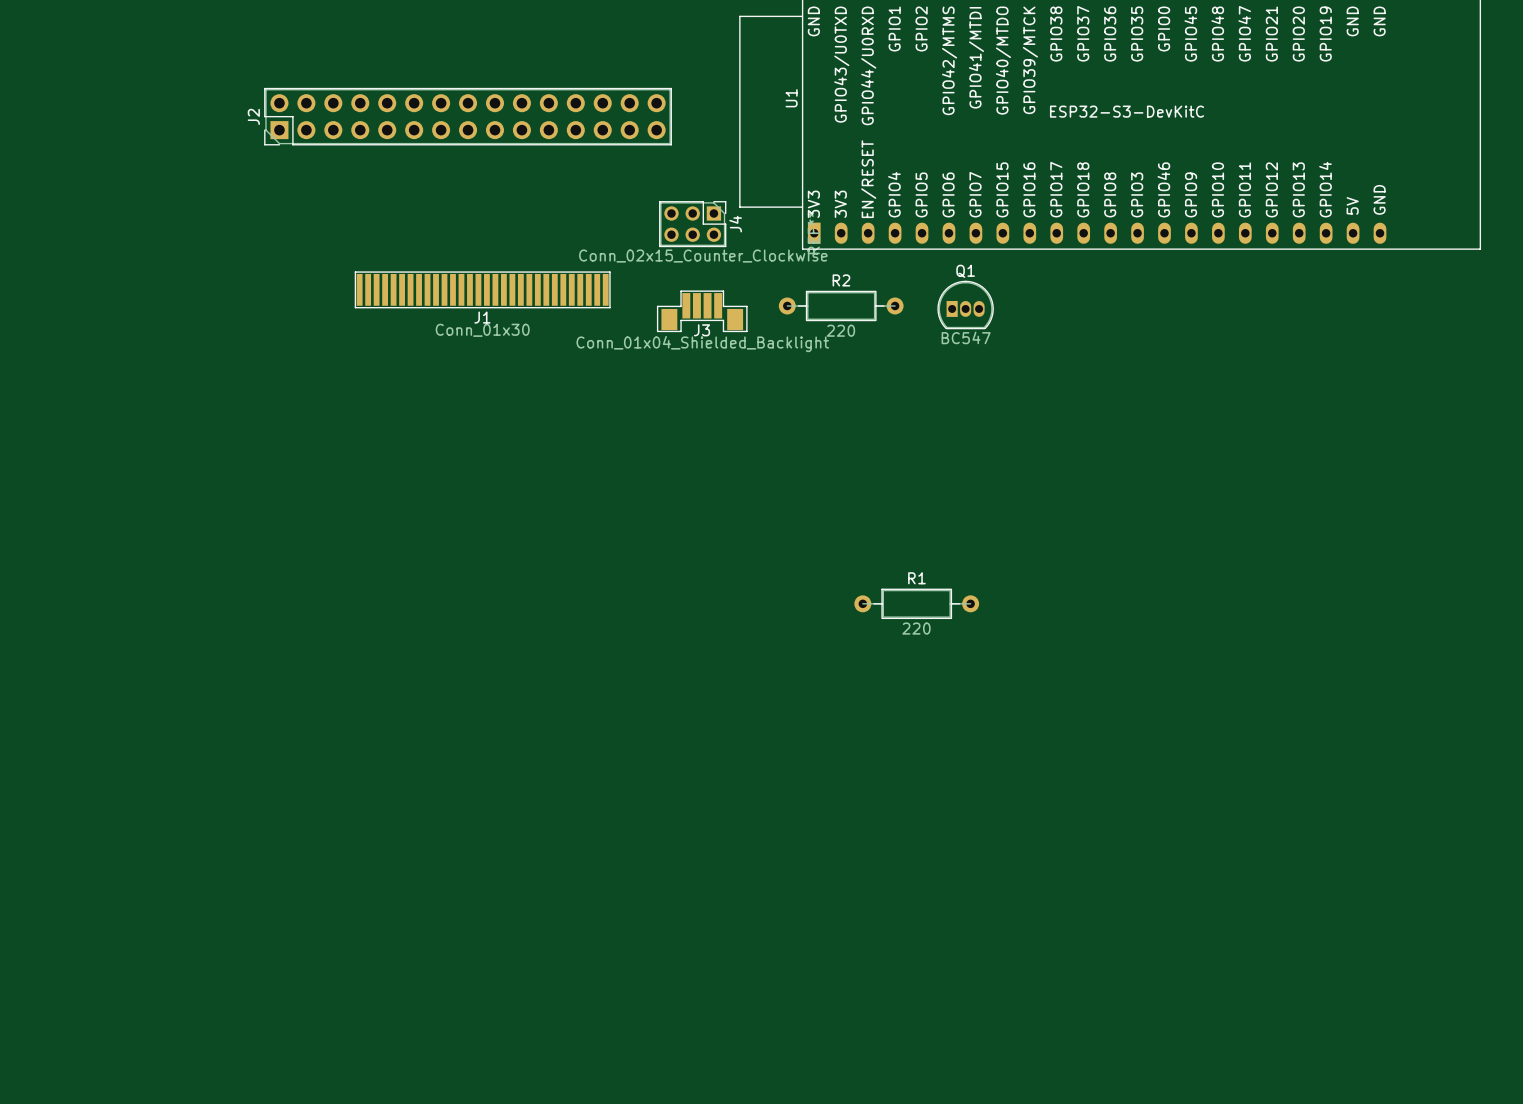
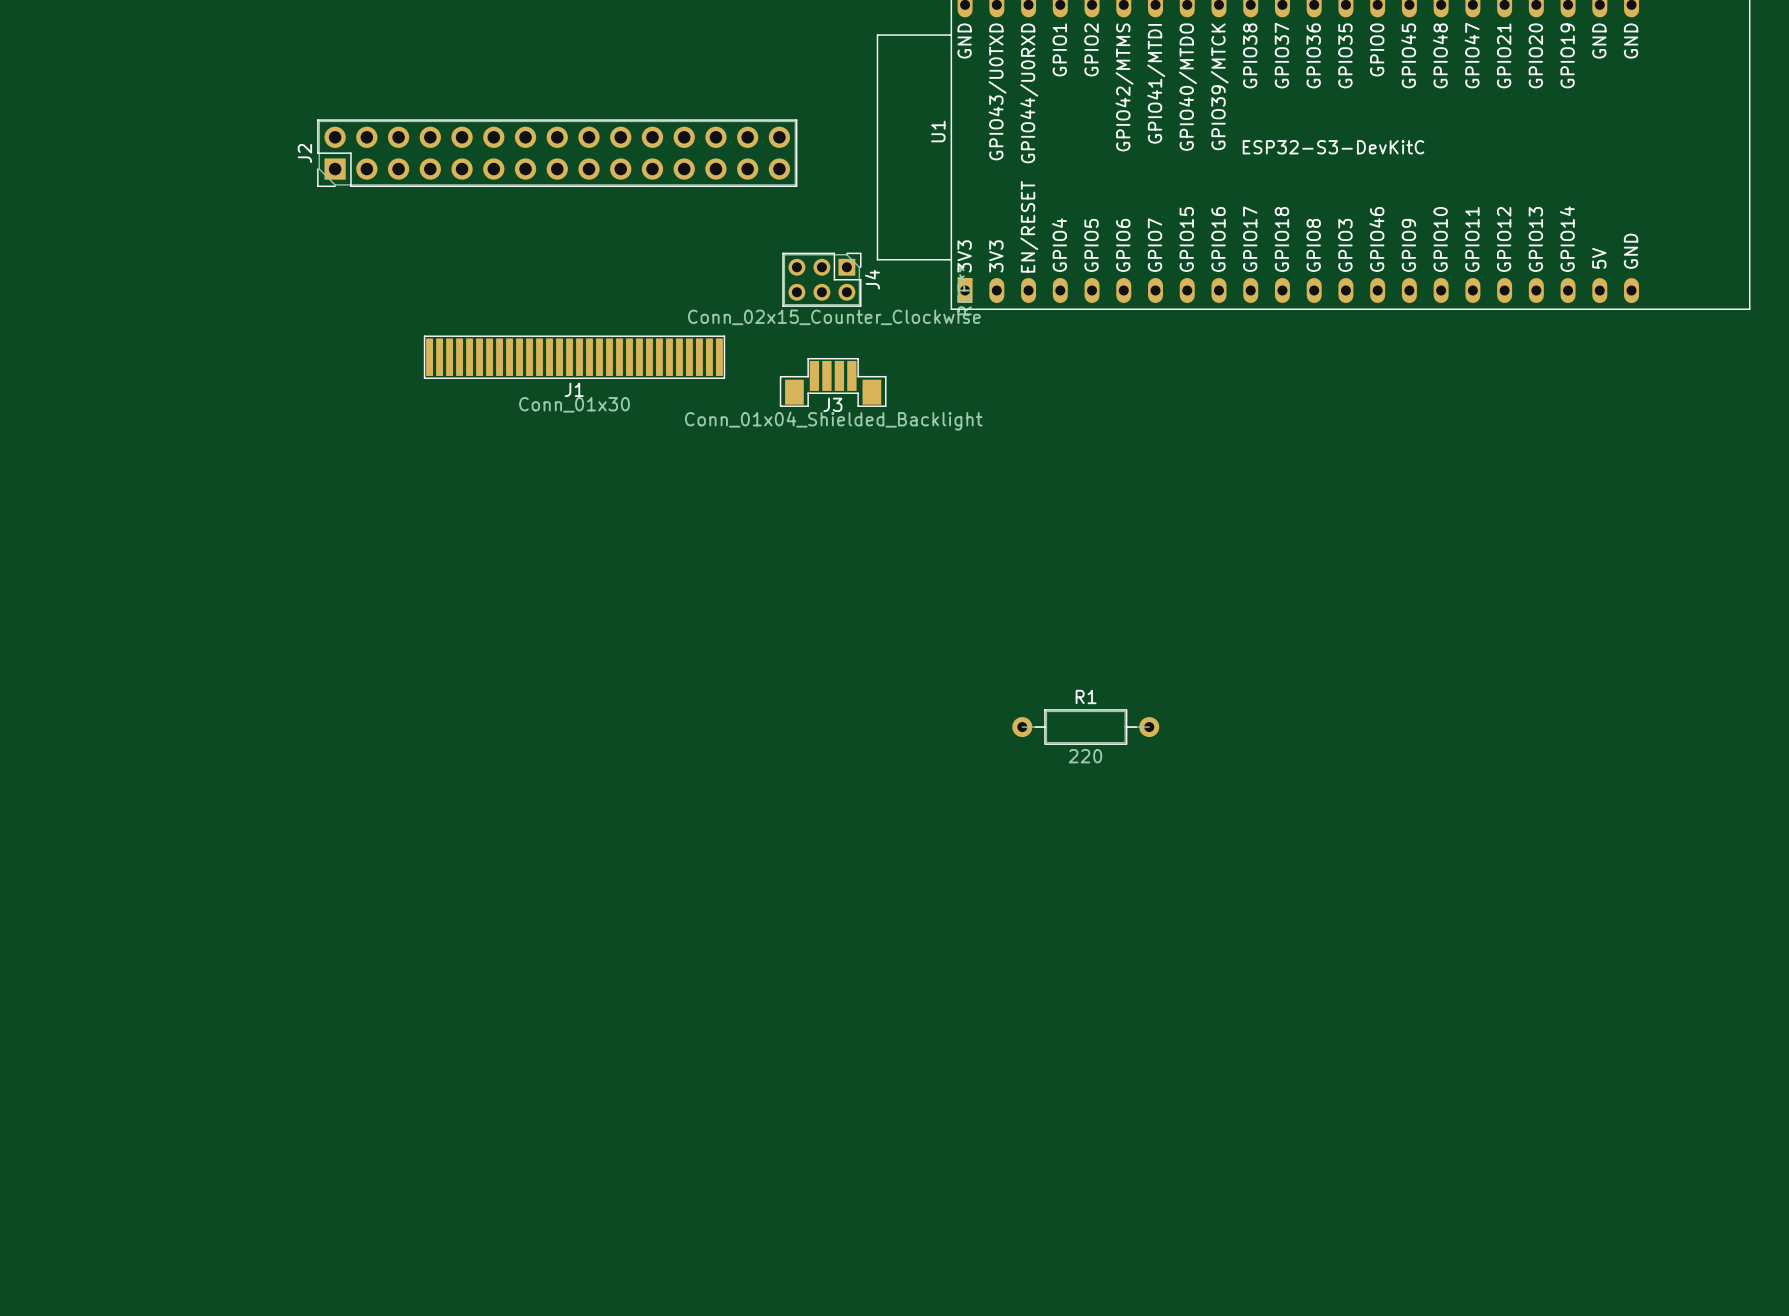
Q1: BC547 (965, 304) -> none
R2: 220 (841, 305) -> none

